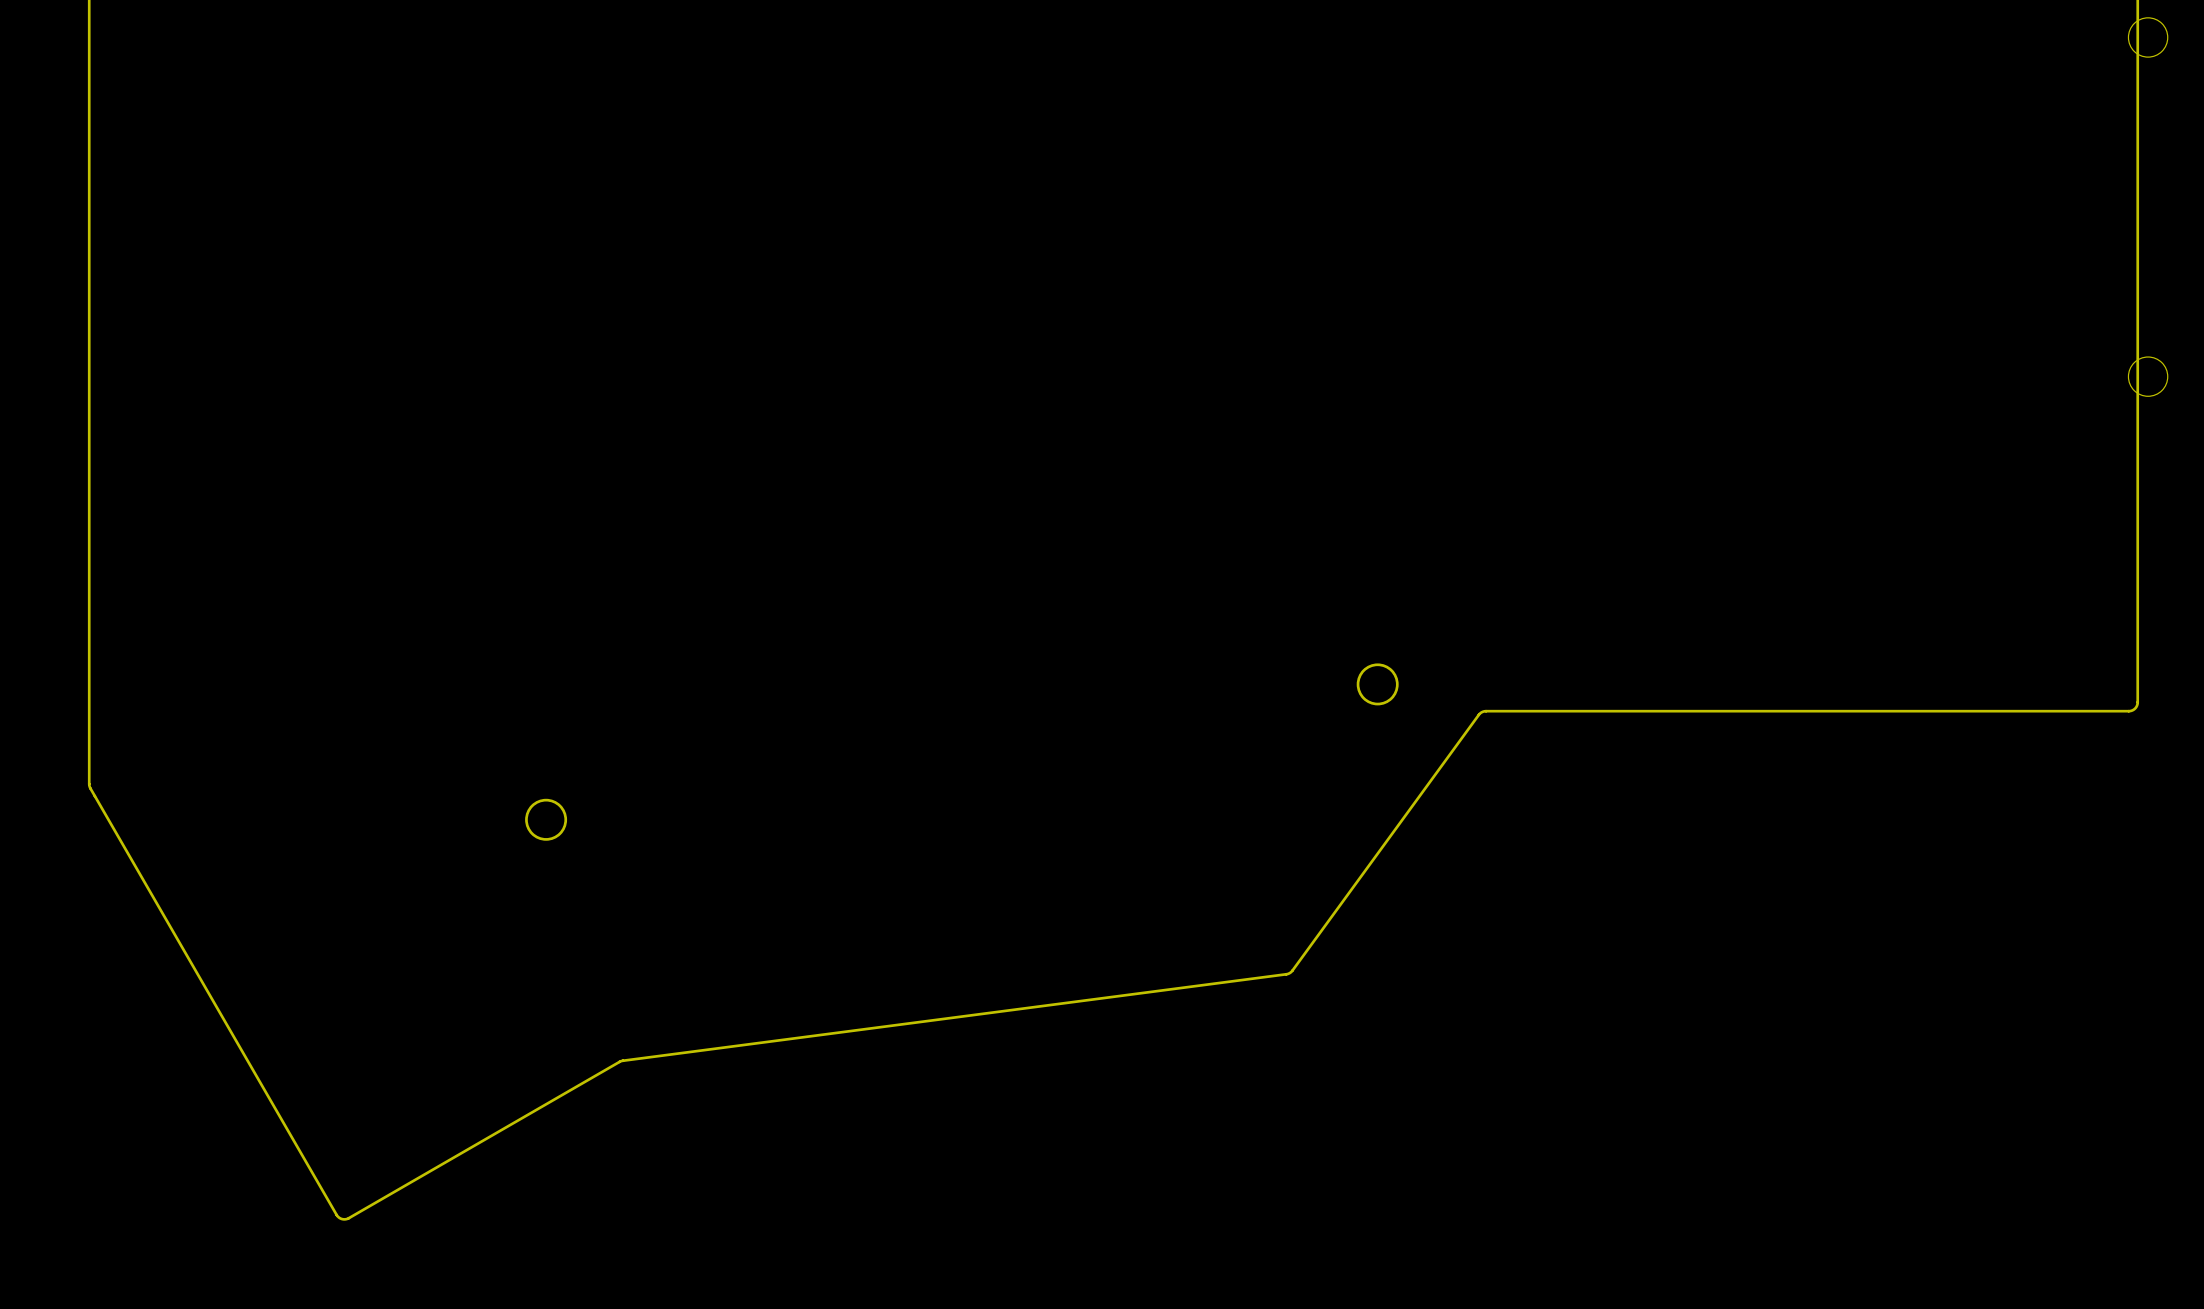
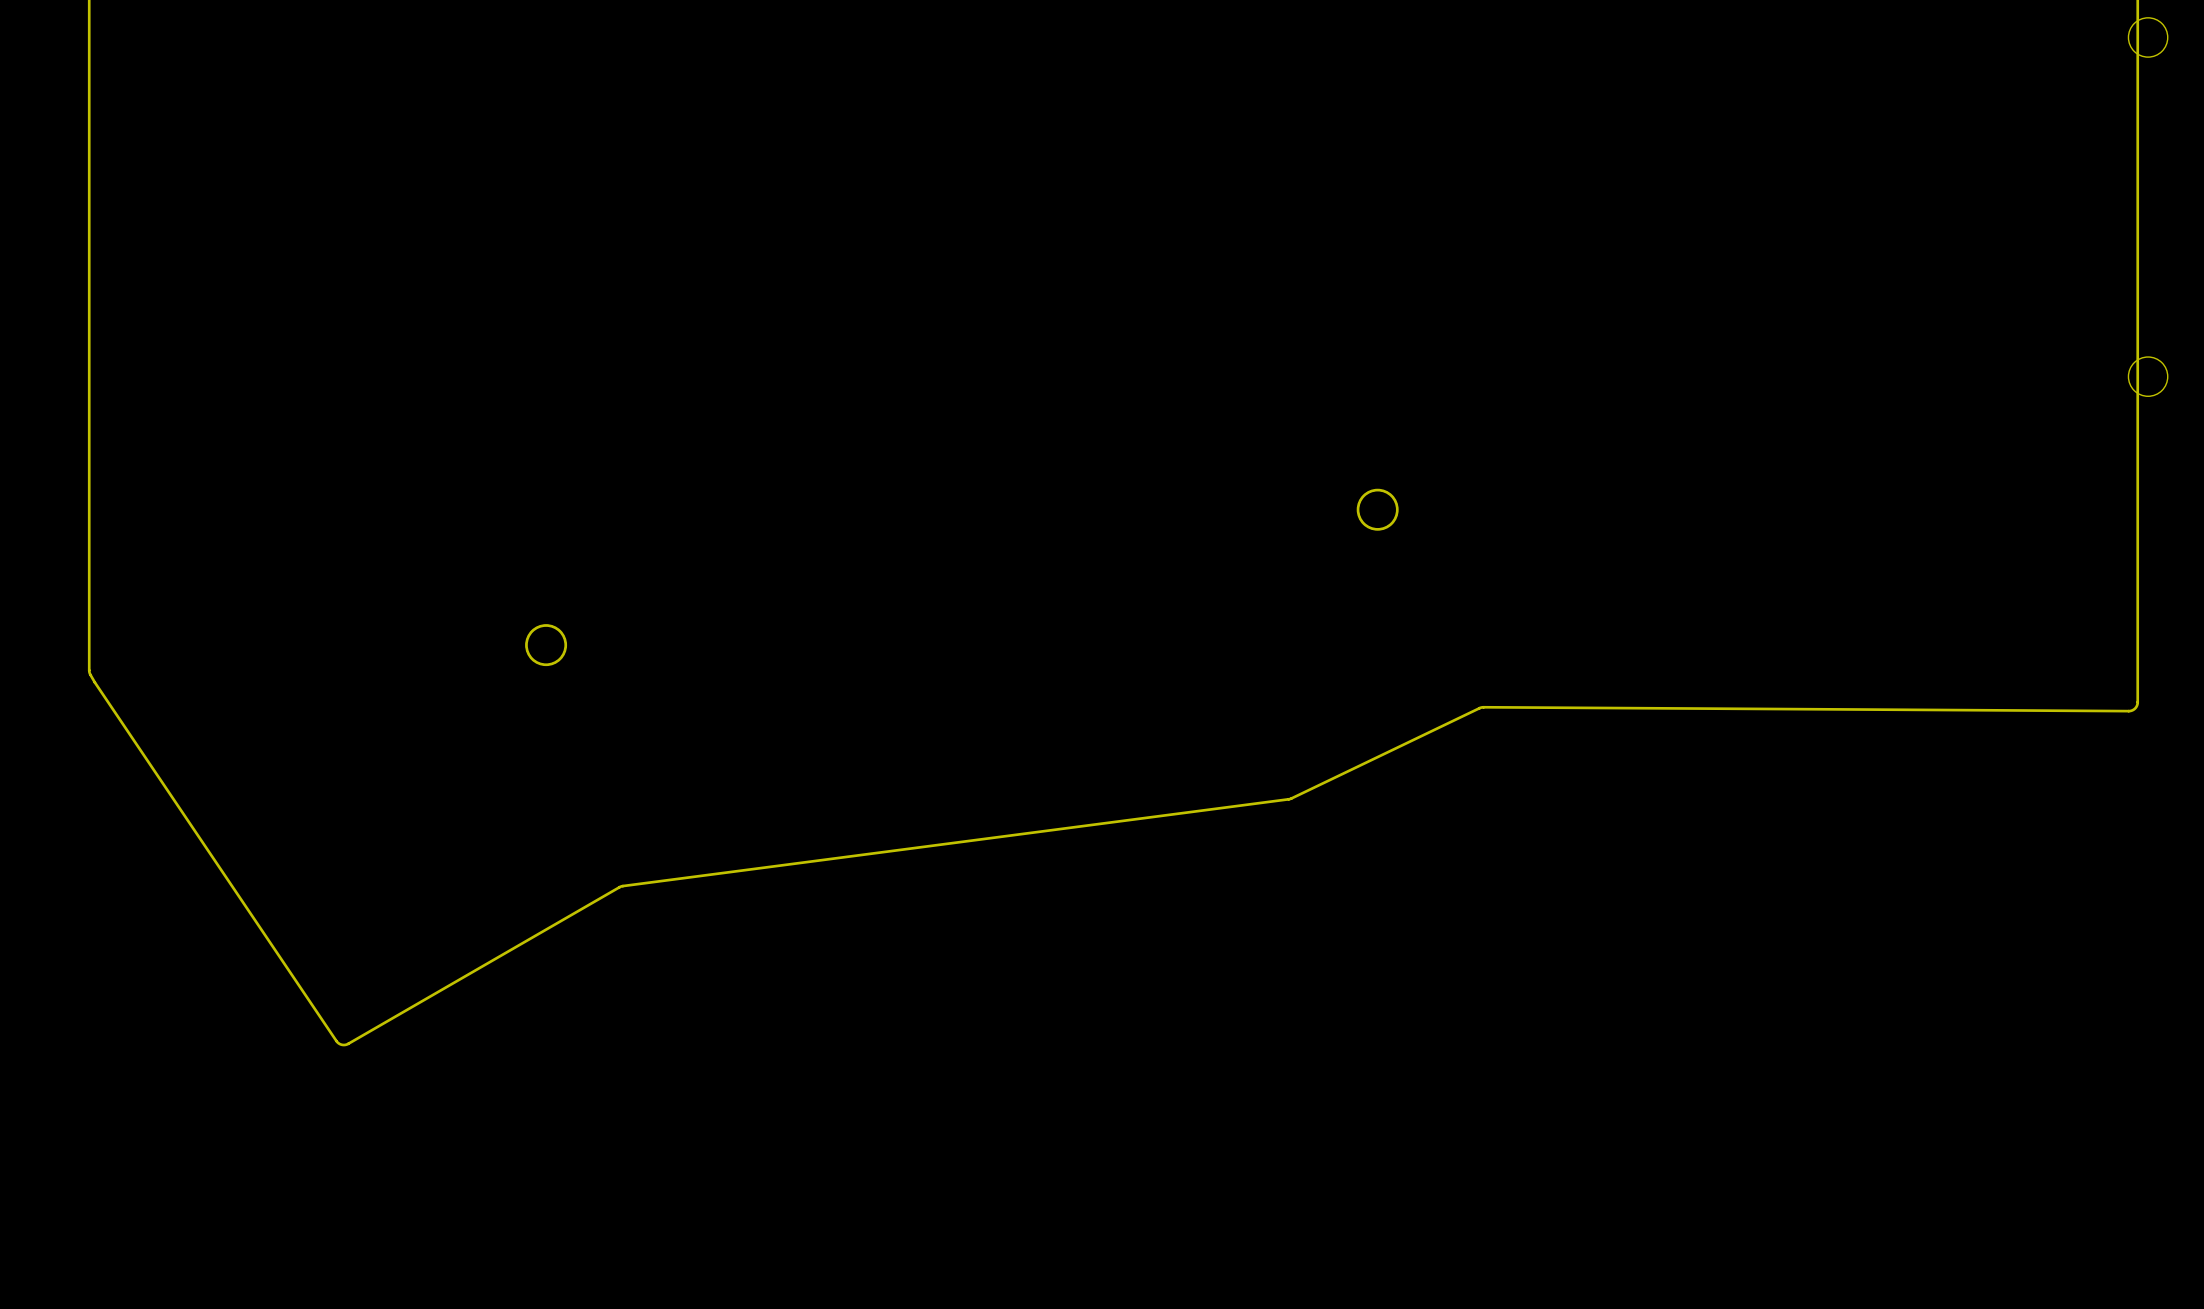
board edge: (89, 670) (89, 787) (336, 1214) (344, 1219) (622, 1060) (1288, 973) (1478, 714) (1483, 711) (2128, 711) (2135, 708) (2137, 702) -> (89, 670) (94, 682) (336, 1041) (344, 1045) (621, 886) (1289, 799) (1481, 707) (2128, 711) (2135, 708) (2137, 702)
round board edge position: (1377, 684) -> (1377, 509)
round board edge position: (546, 819) -> (546, 645)

